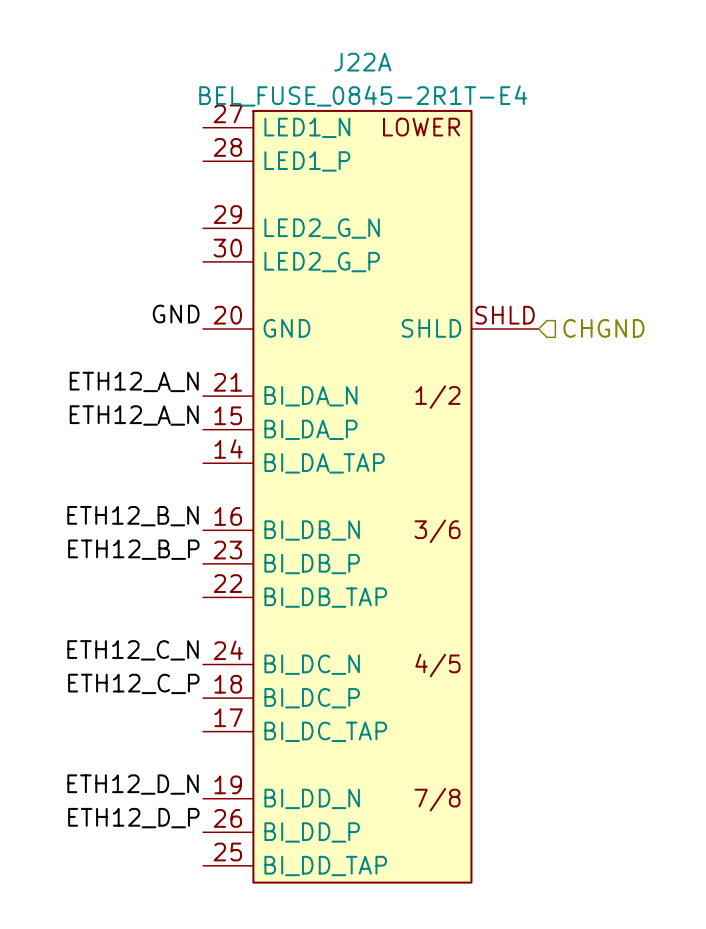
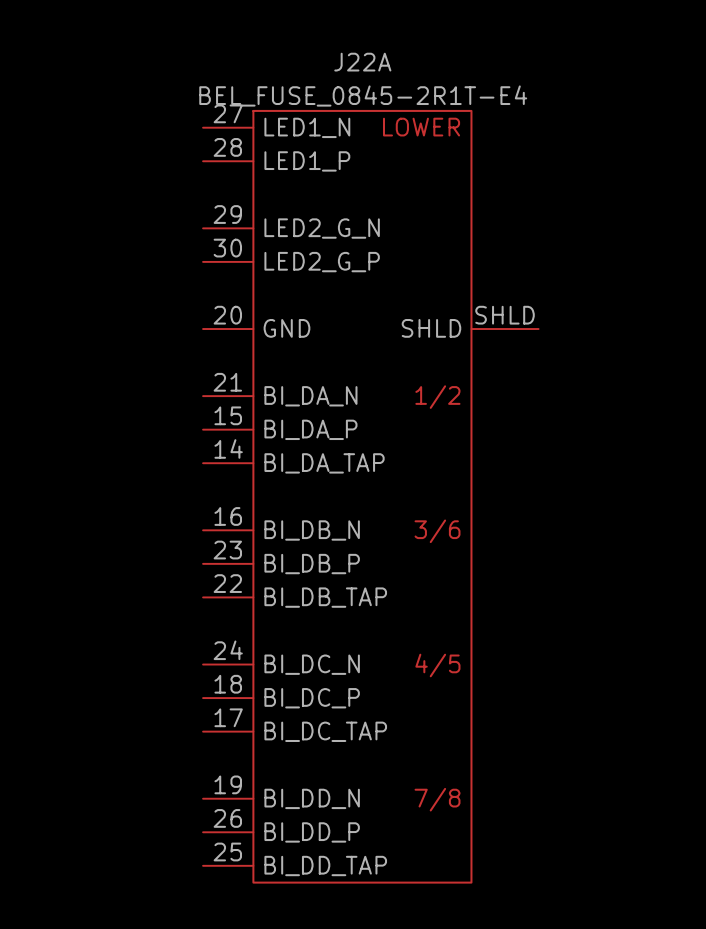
label: GND (176, 314) -> none
hierarchical label: CHGND (603, 328) -> none
label: ETH12_A_N (134, 381) -> none
label: ETH12_A_N (134, 415) -> none
label: ETH12_B_N (133, 516) -> none
label: ETH12_B_P (133, 549) -> none
label: ETH12_C_N (133, 650) -> none
label: ETH12_C_P (133, 683) -> none
label: ETH12_D_N (133, 784) -> none
label: ETH12_D_P (133, 818) -> none

